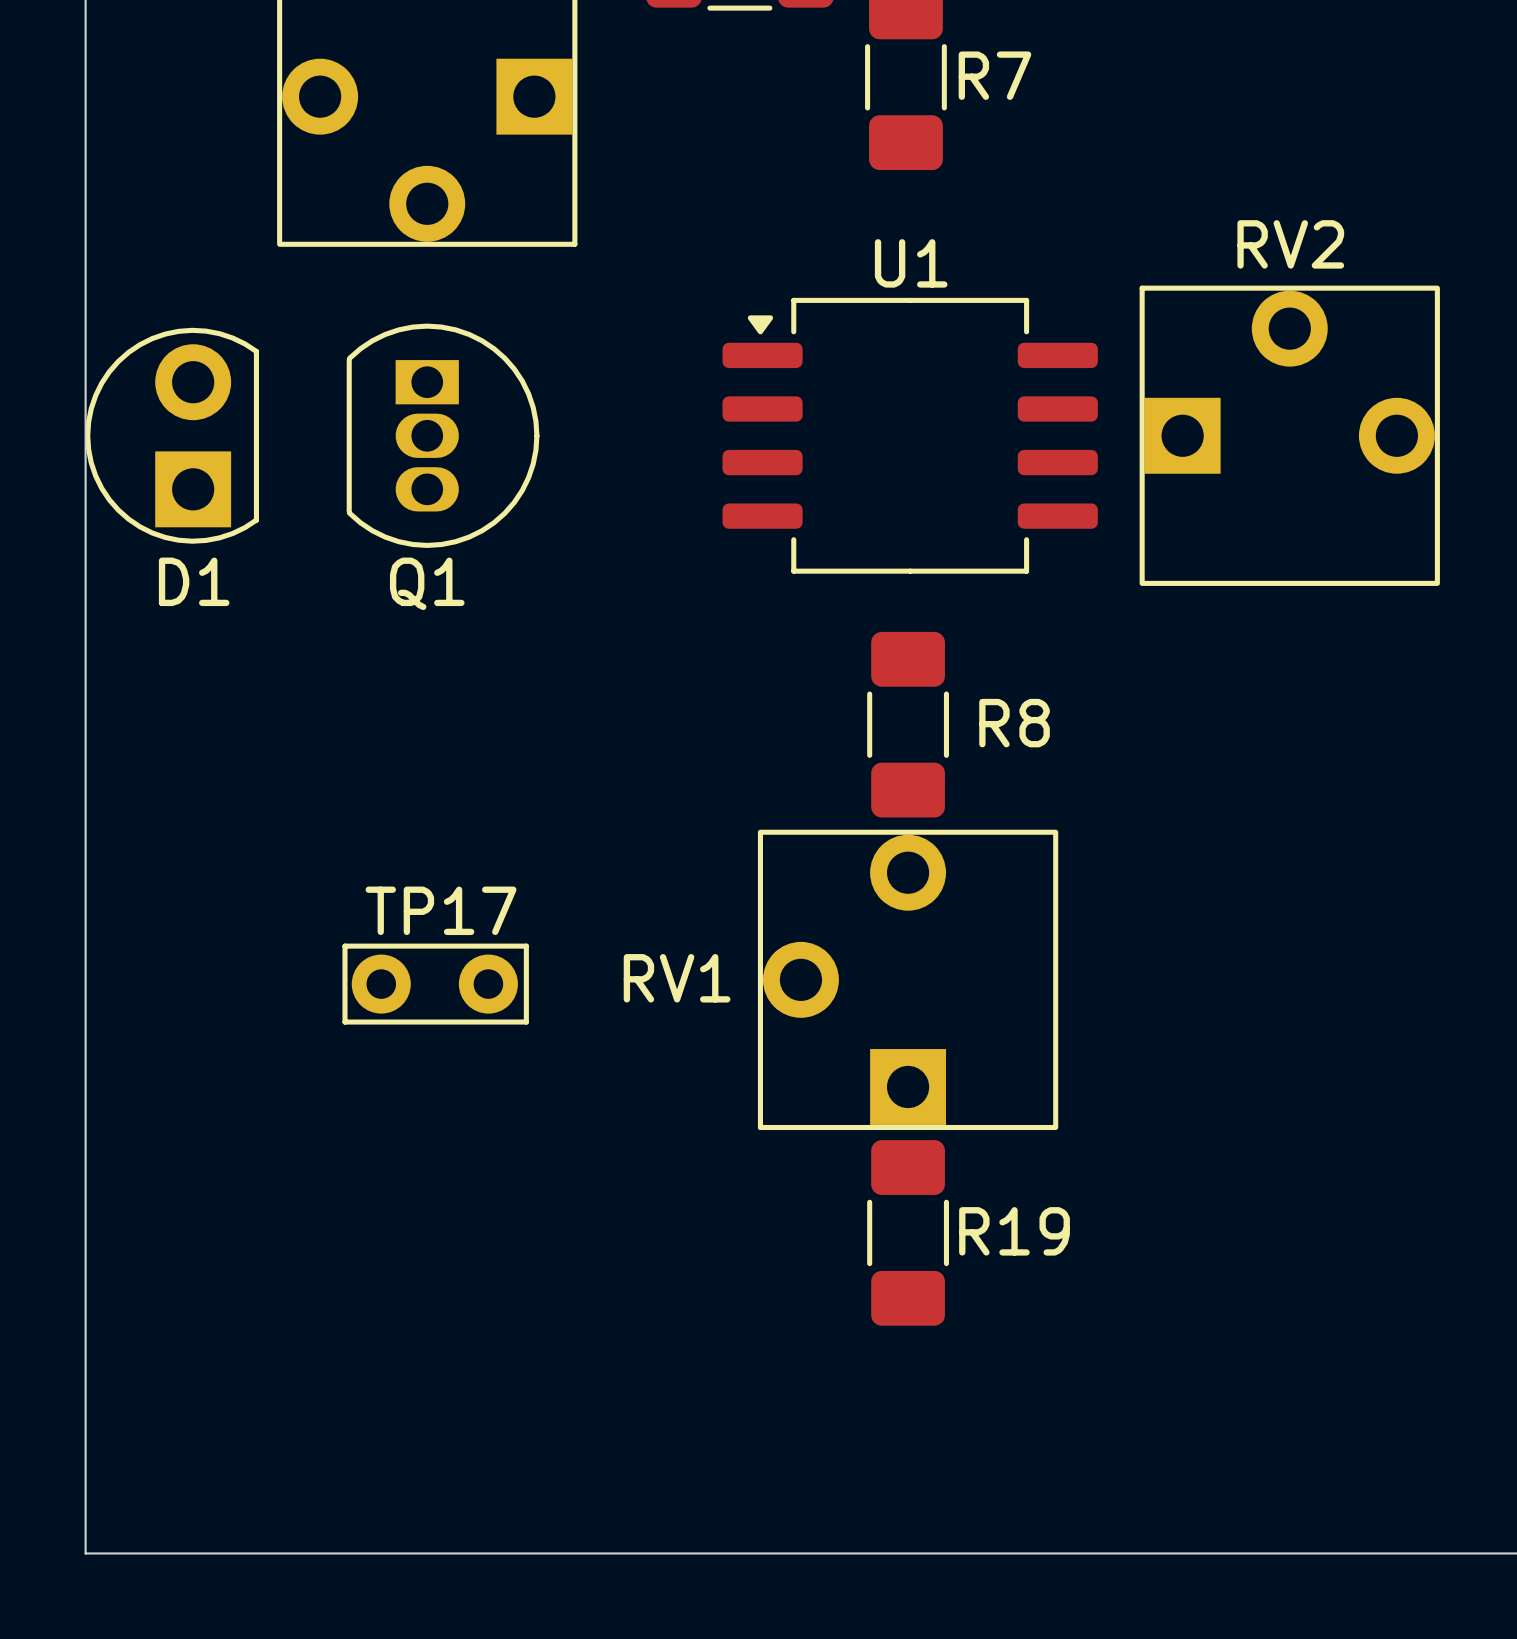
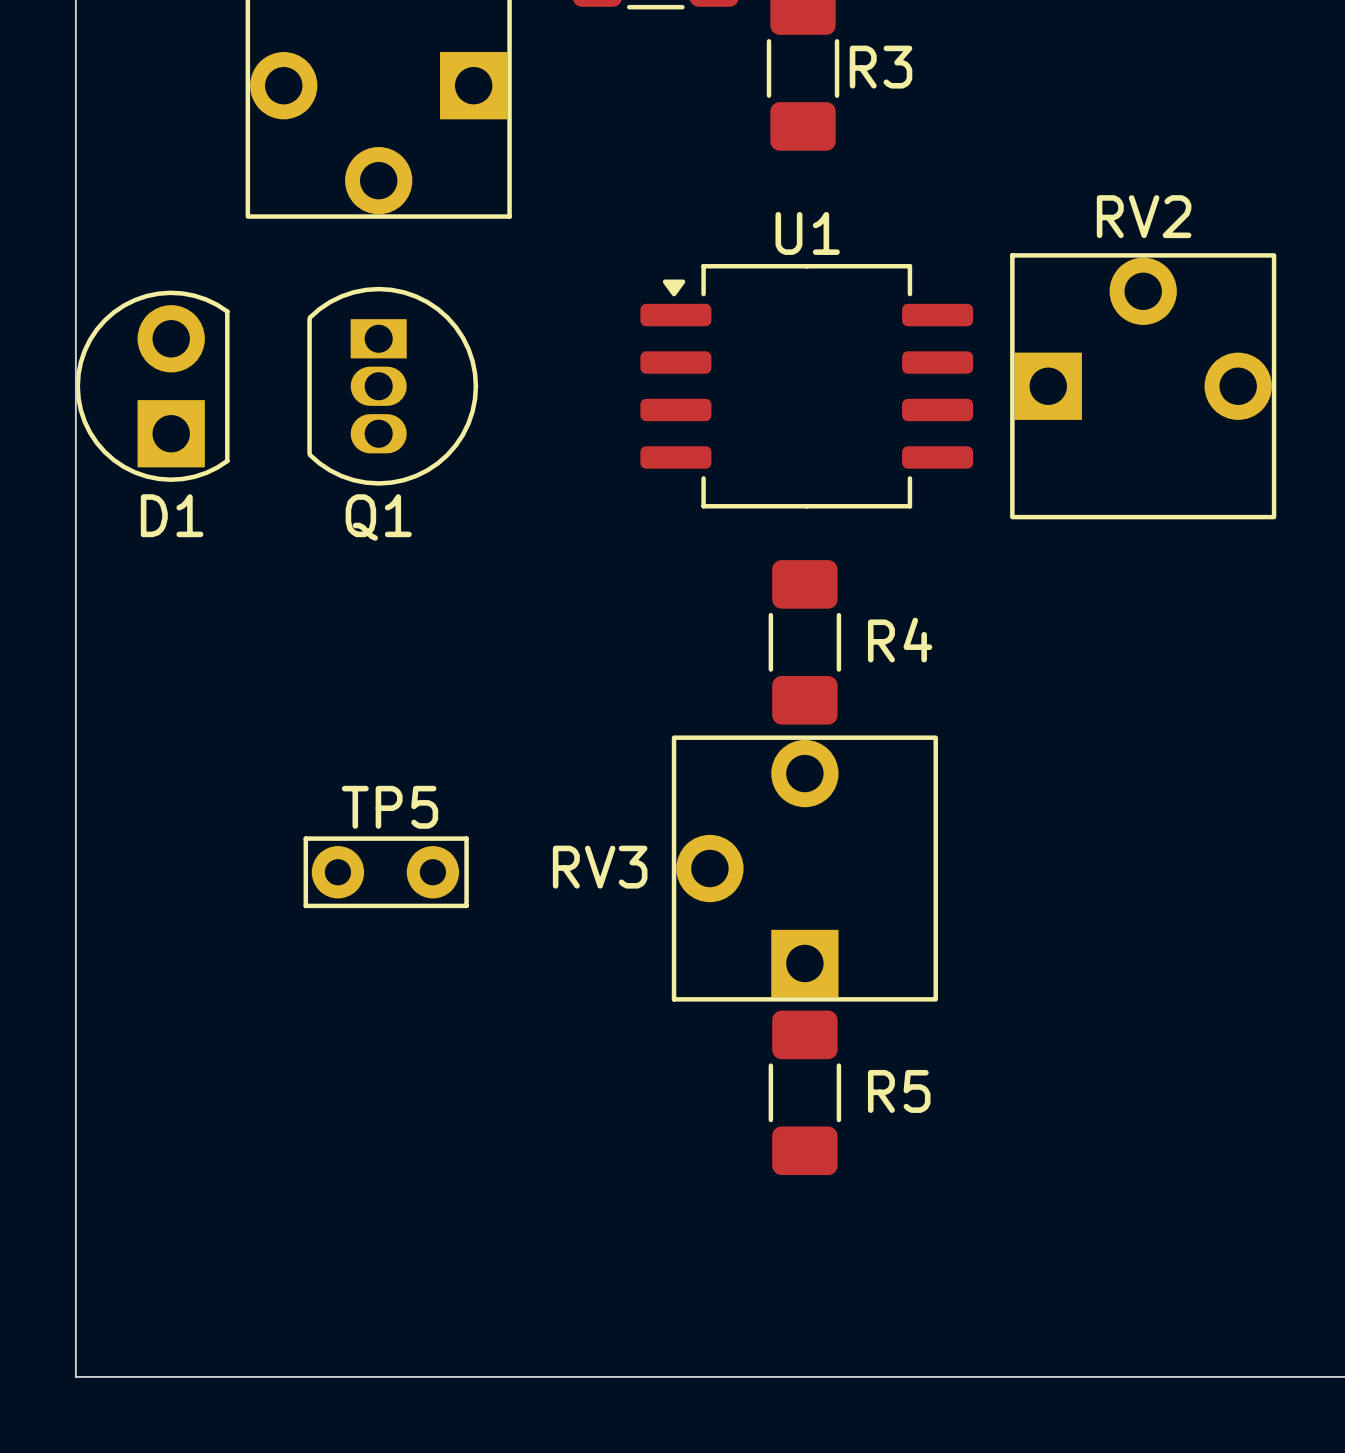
R7 name: R7 (994, 75) -> R3 (881, 67)
R8 name: R8 (1014, 723) -> R4 (900, 640)
TP17 name: TP17 (441, 910) -> TP5 (390, 807)
RV1 name: RV1 (677, 978) -> RV3 (600, 867)
R19 name: R19 (1014, 1231) -> R5 (899, 1091)

